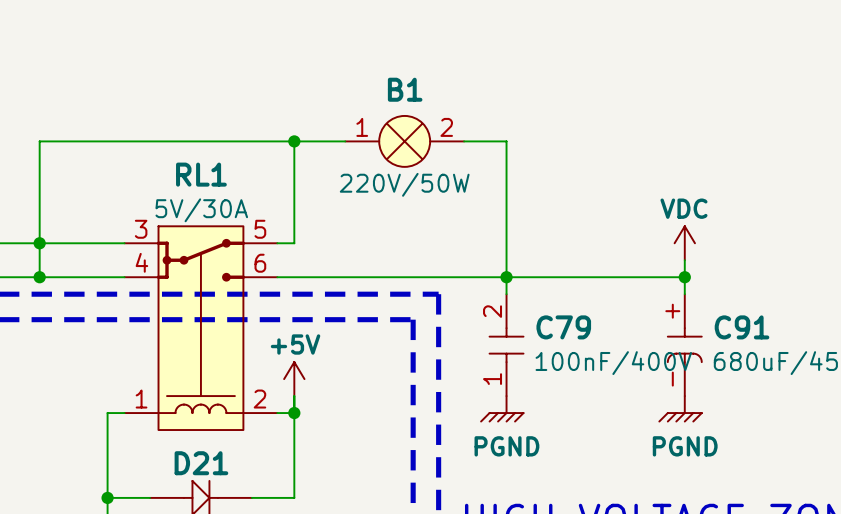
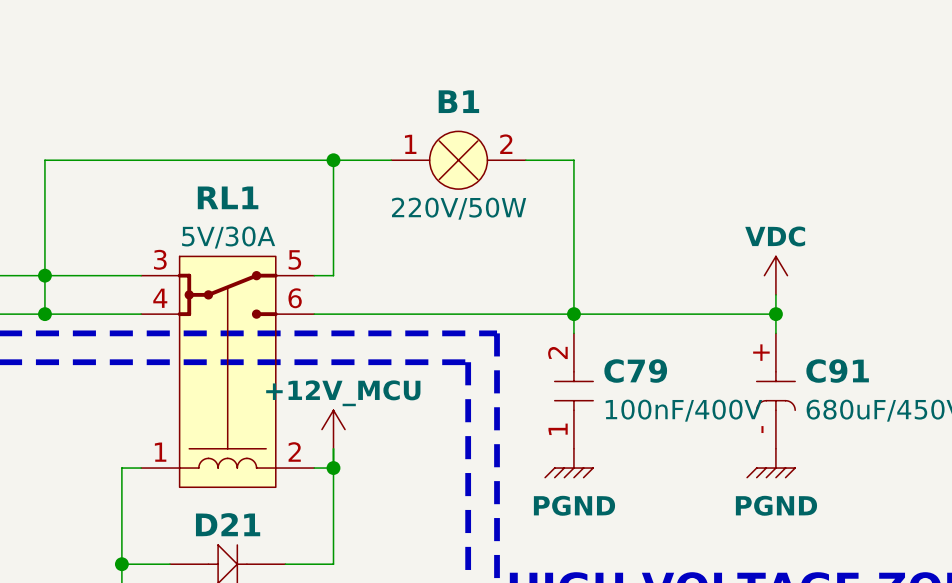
power symbol: +5V (294, 379) -> +12V_MCU (333, 429)

